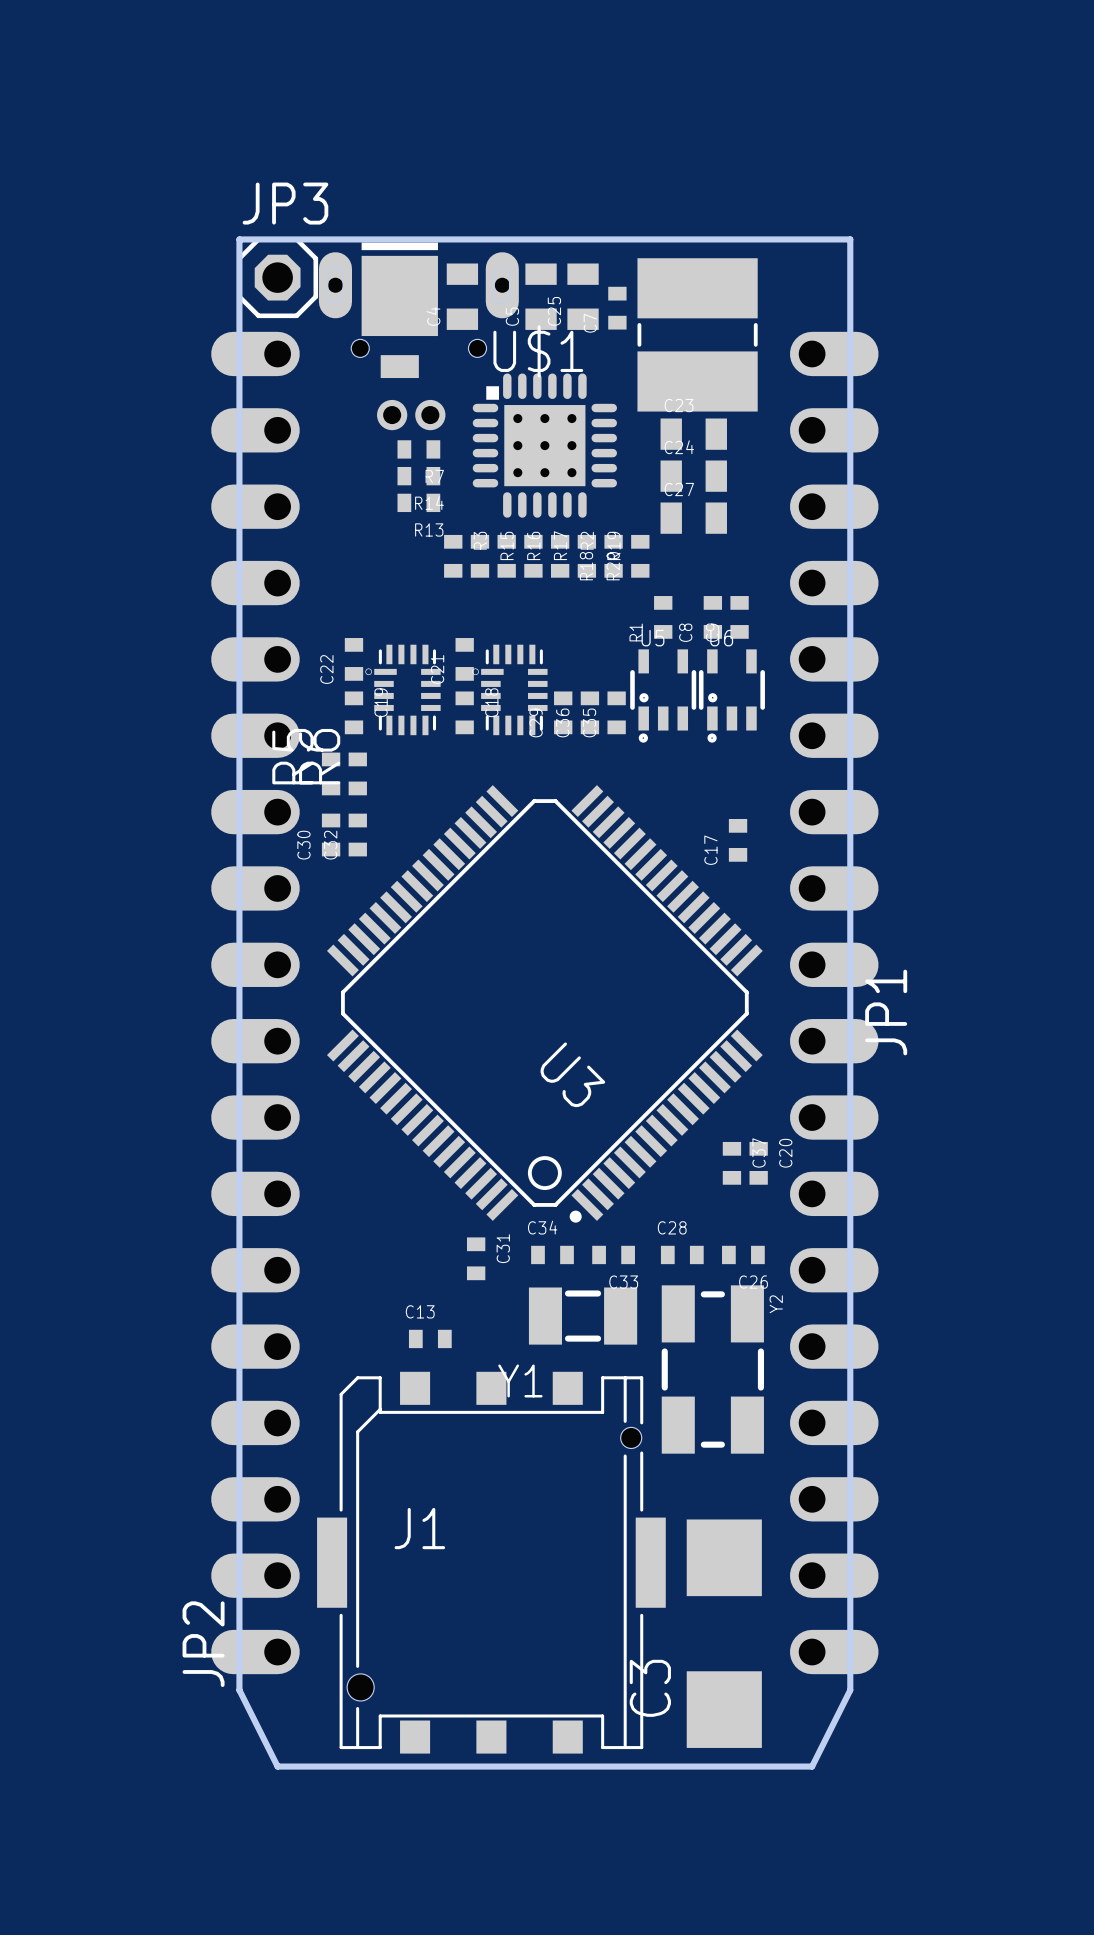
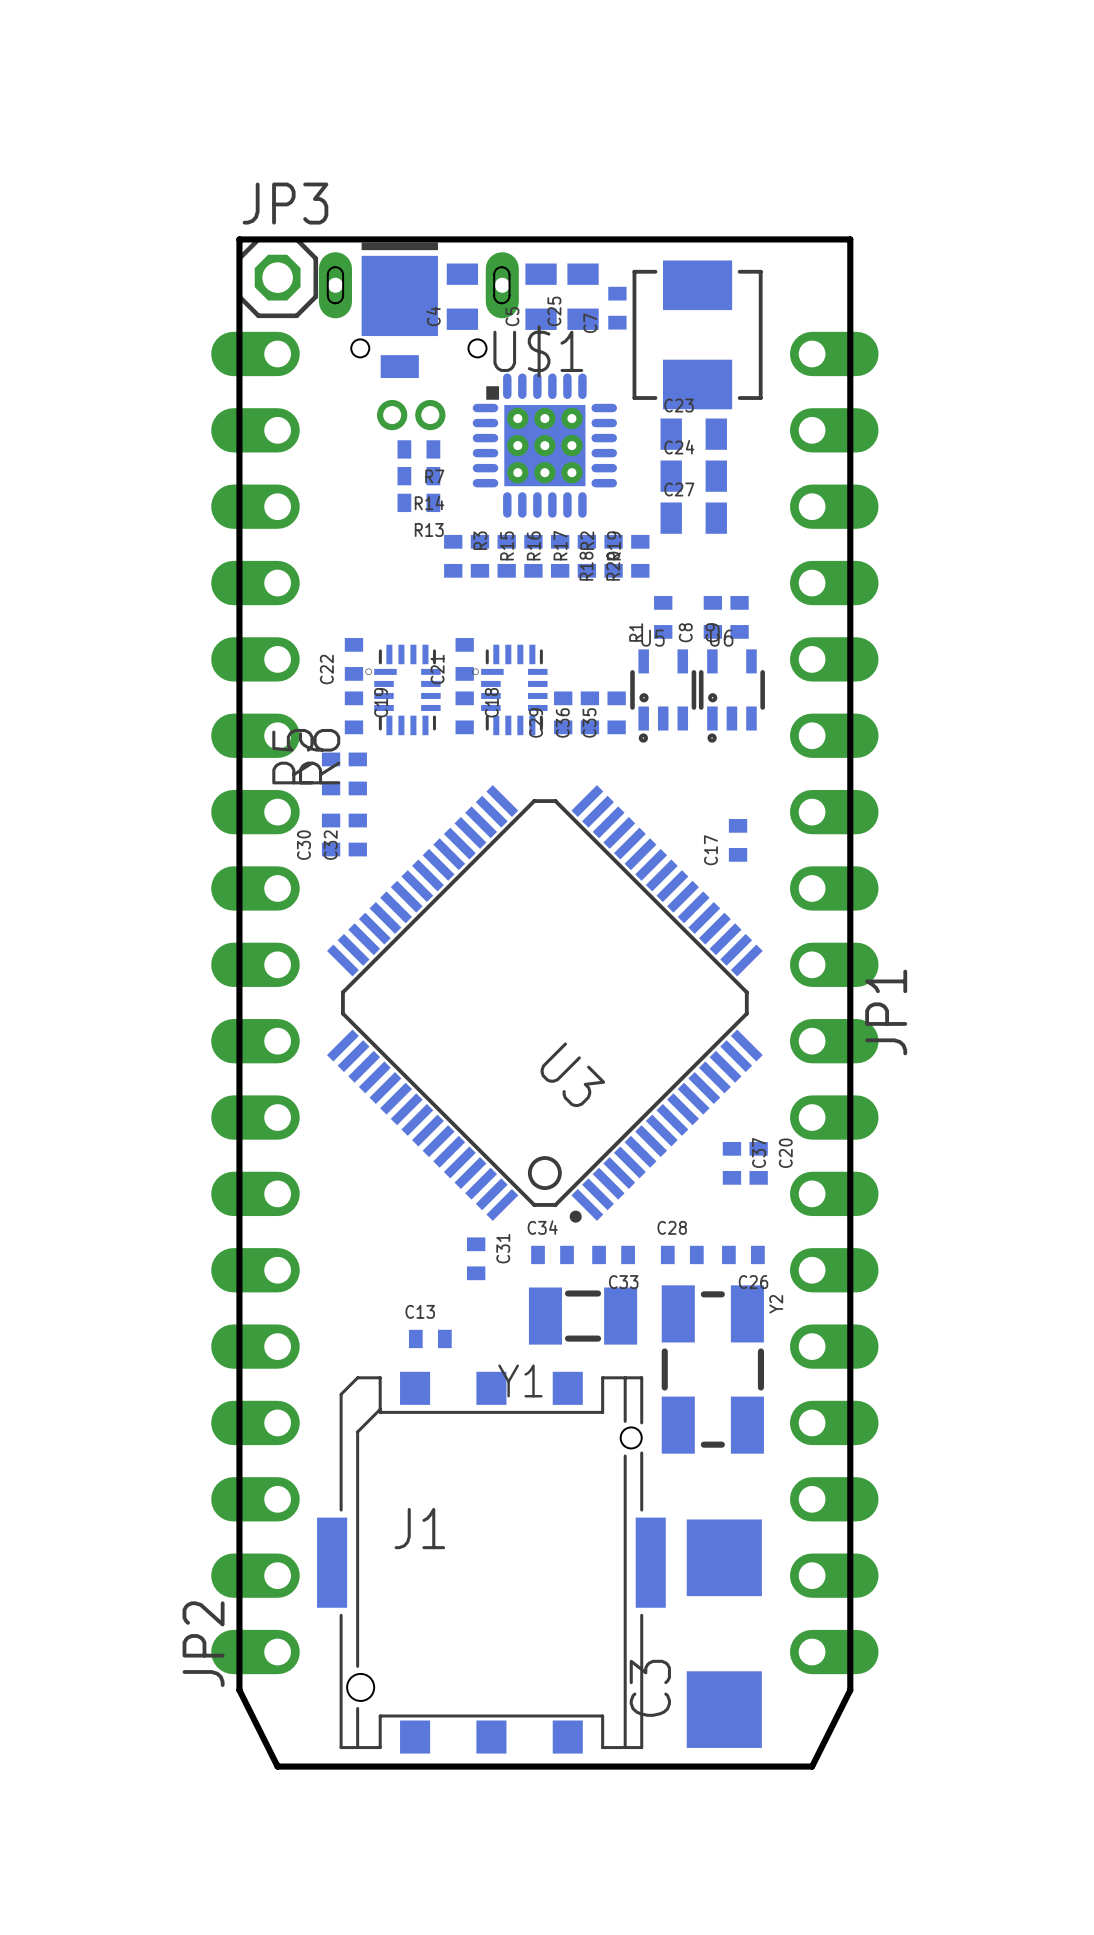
part footprint: [637, 258, 758, 412] -> [632, 260, 763, 410]

